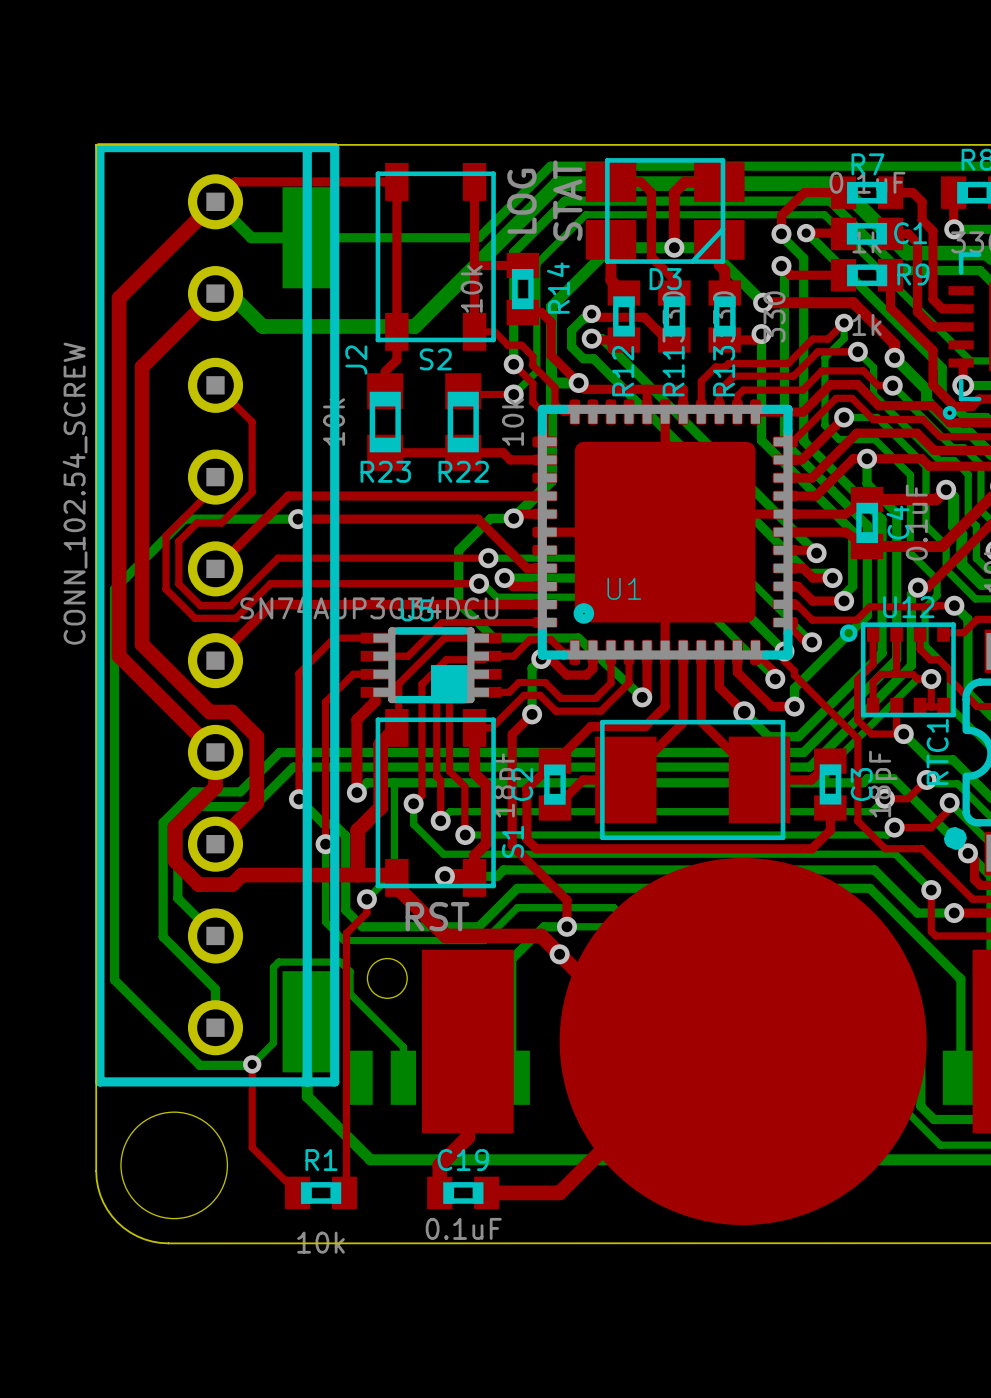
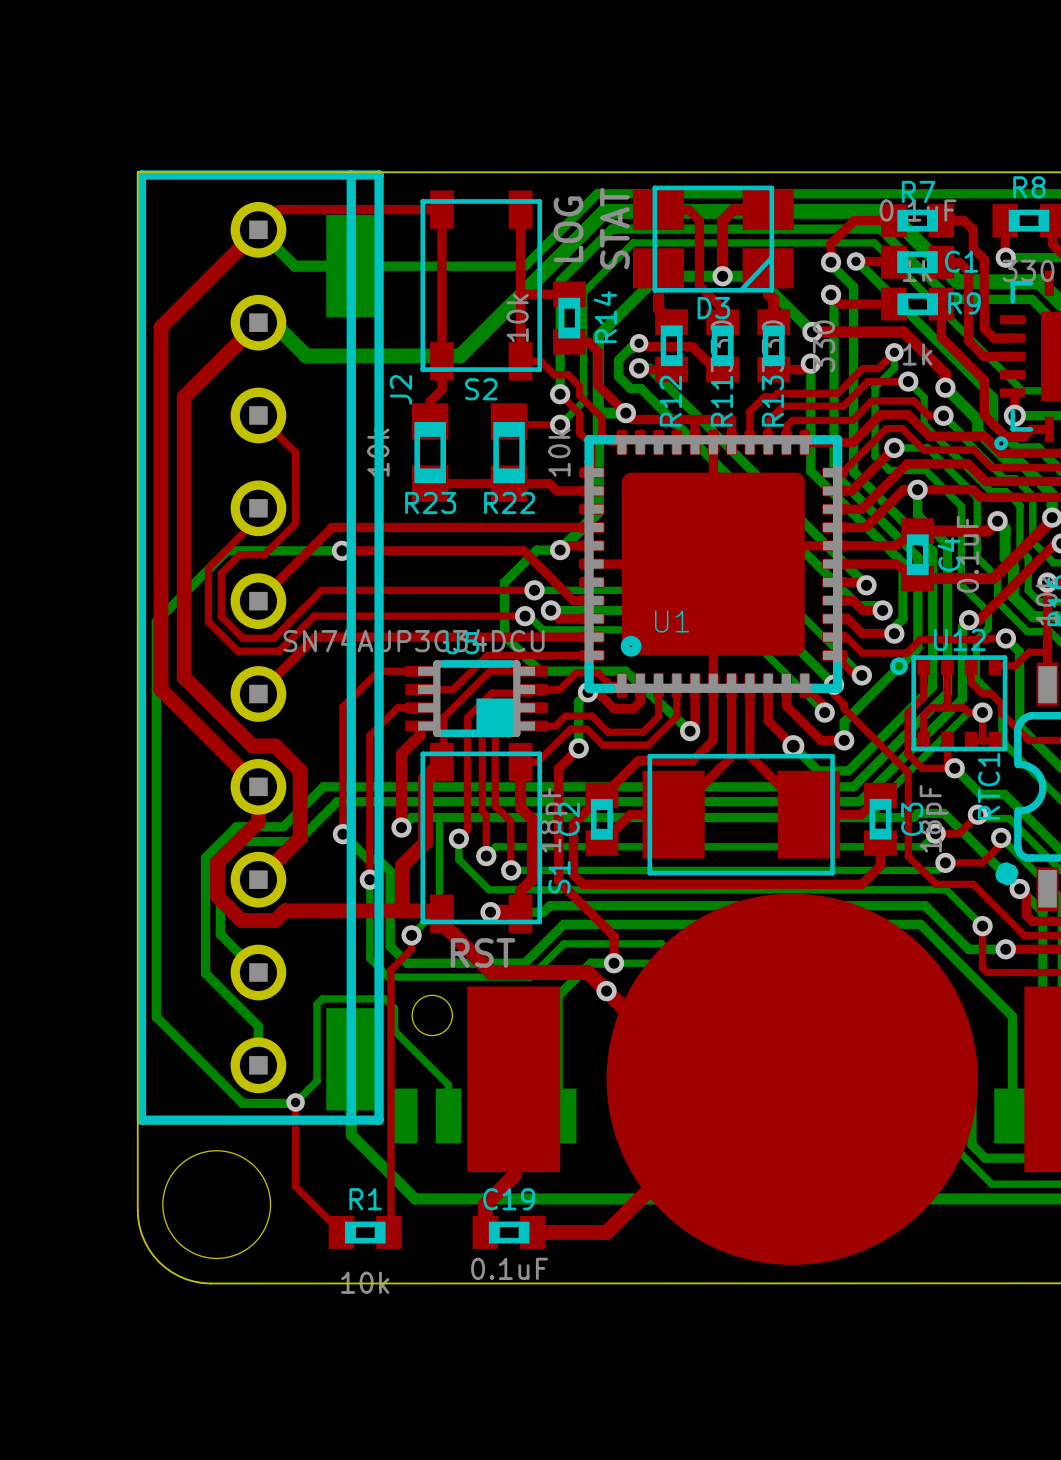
J2 value: CONN_102.54_SCREW (75, 493) -> none

